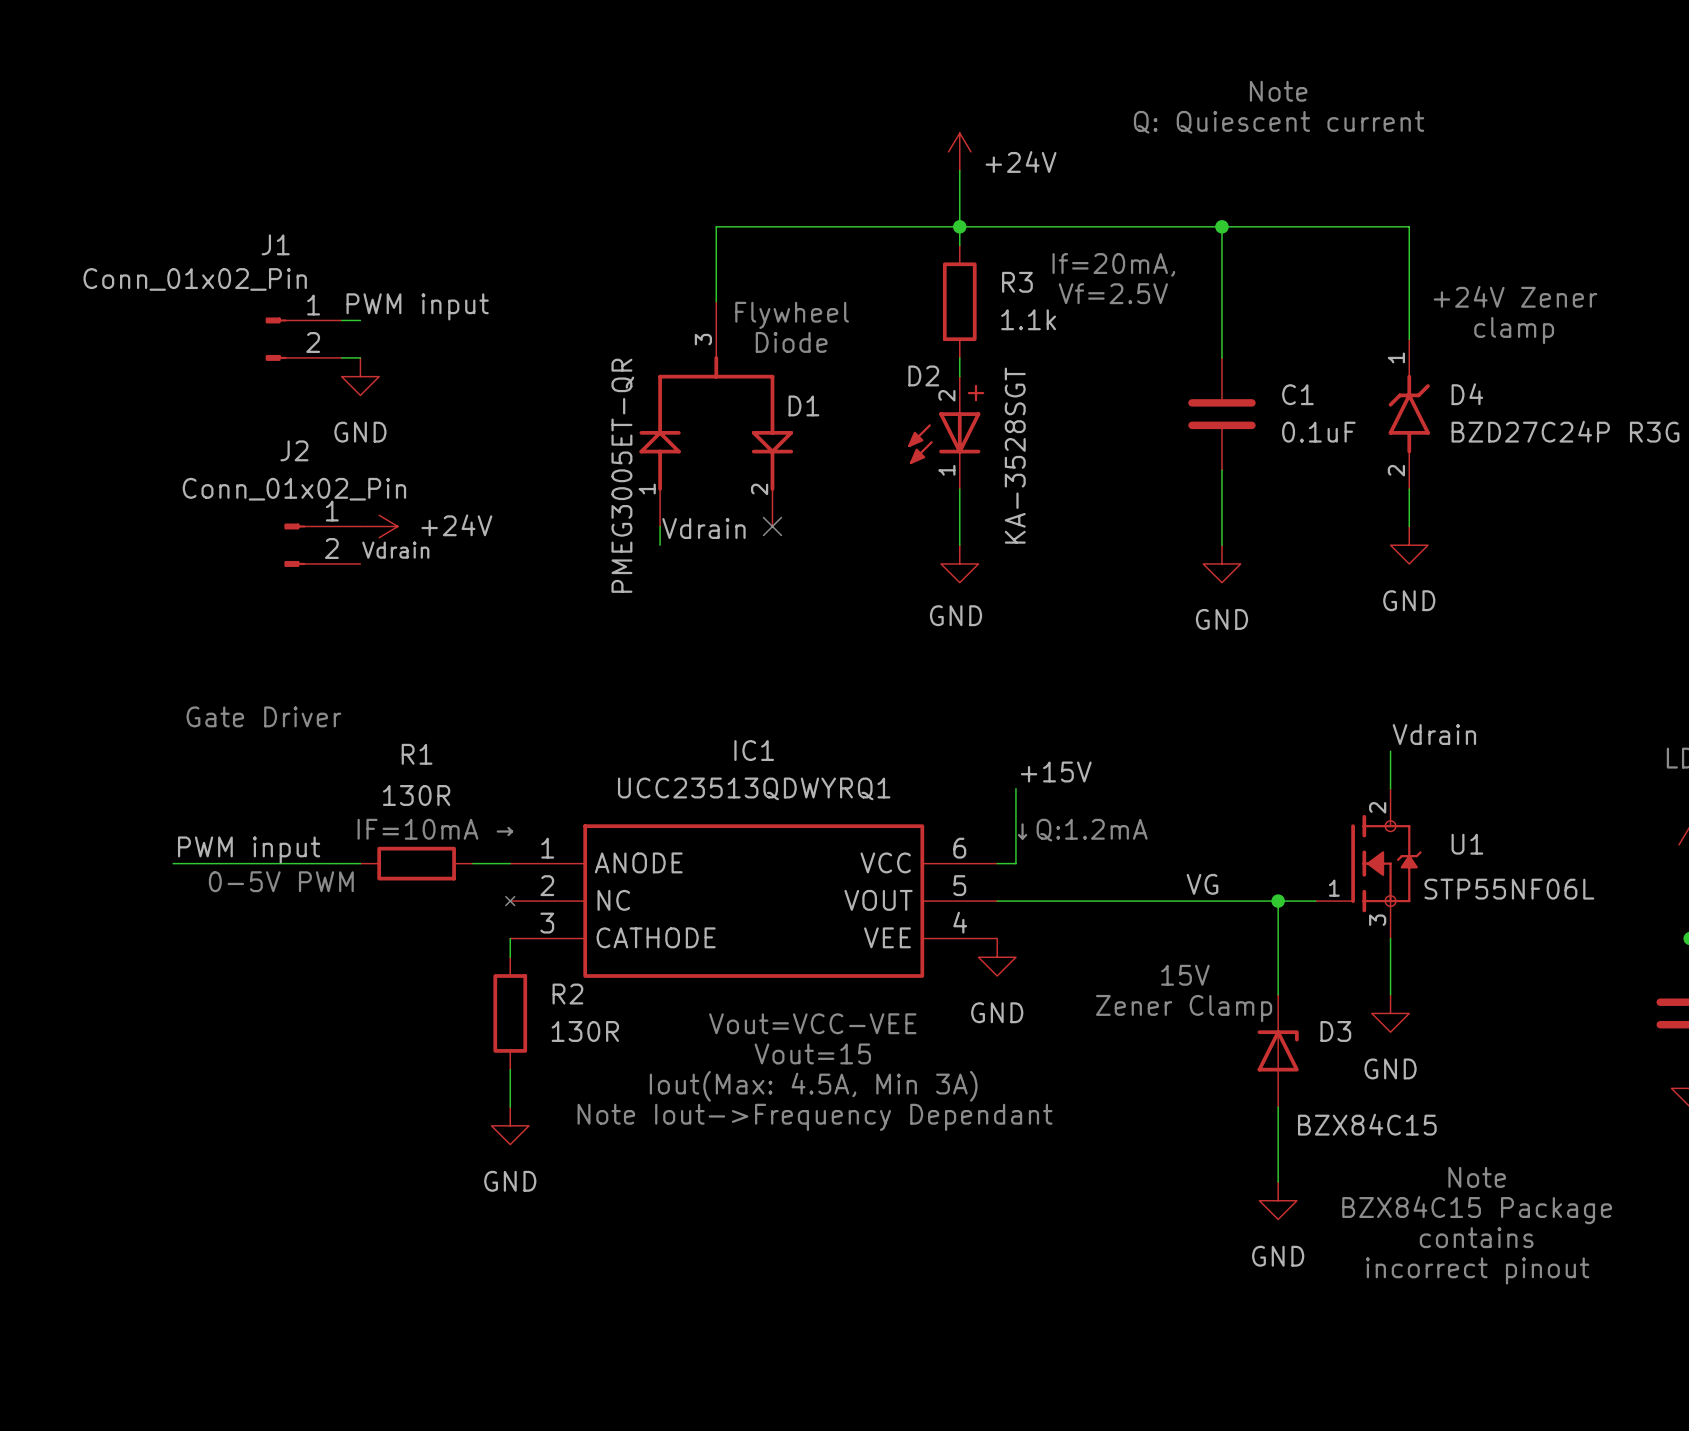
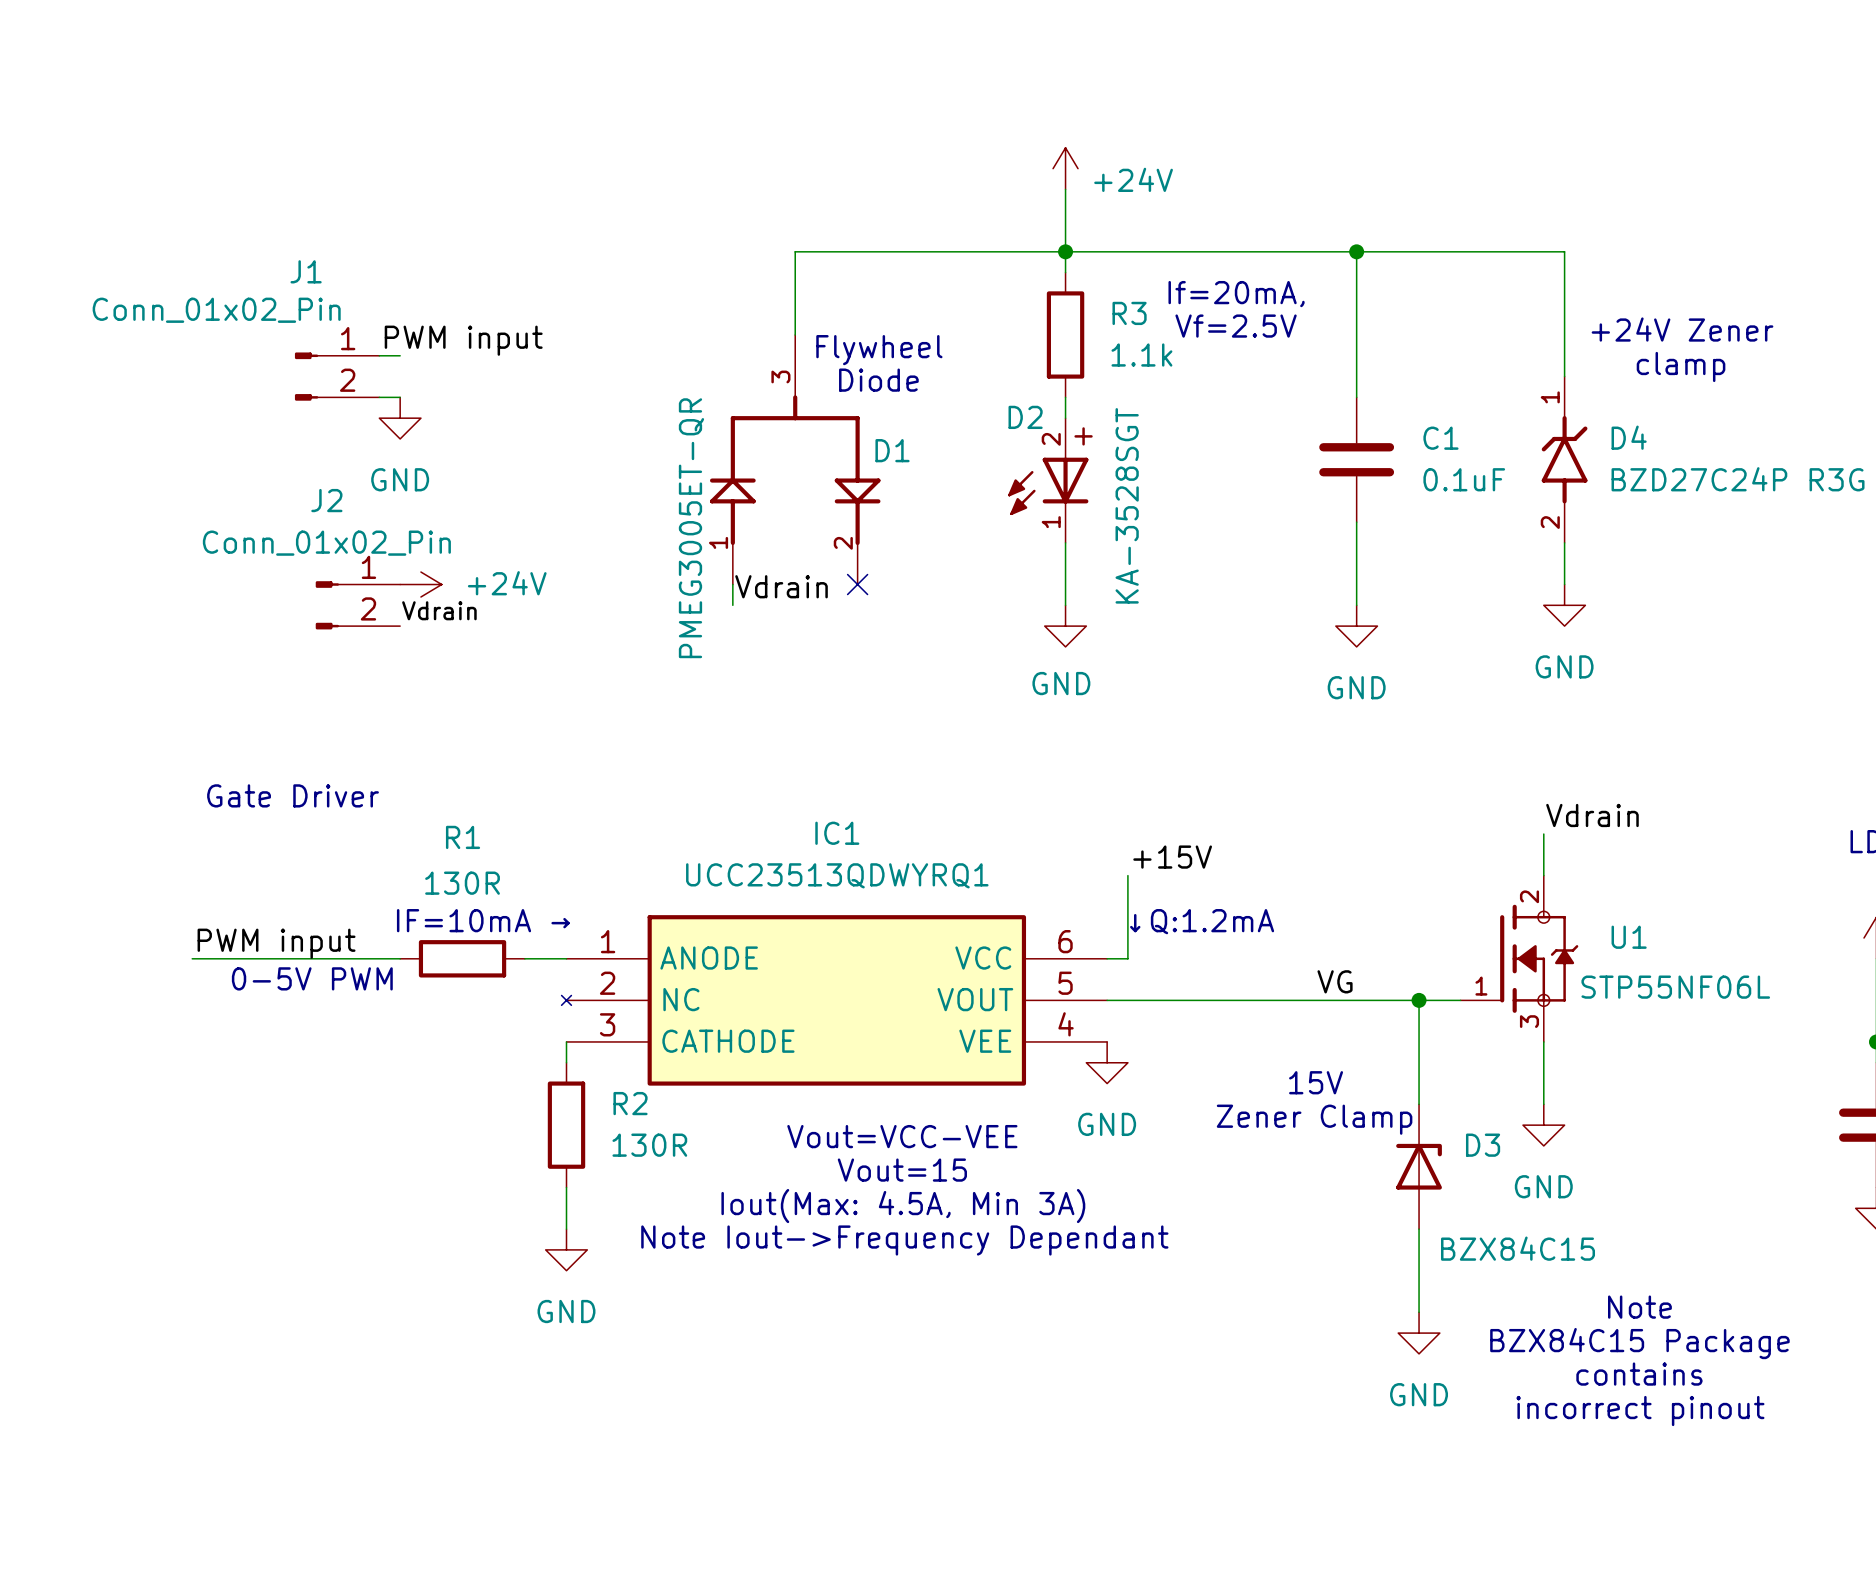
text: Note (1278, 91) -> none
text: Q: Quiescent current (1279, 122) -> none

